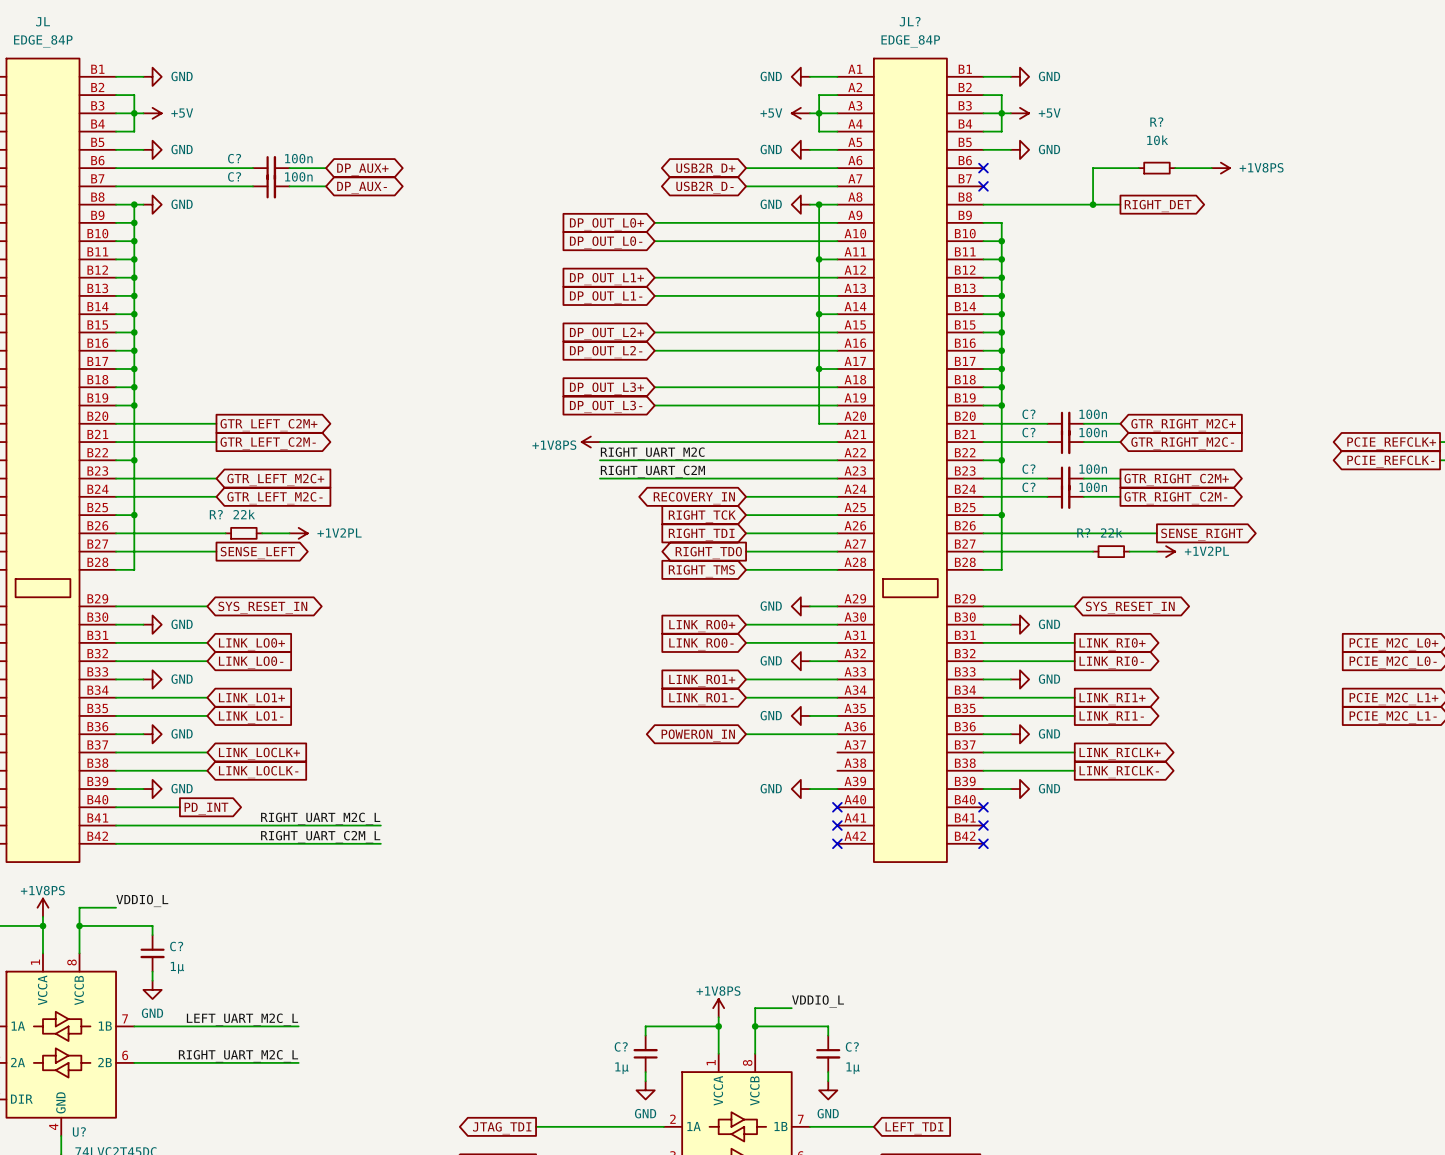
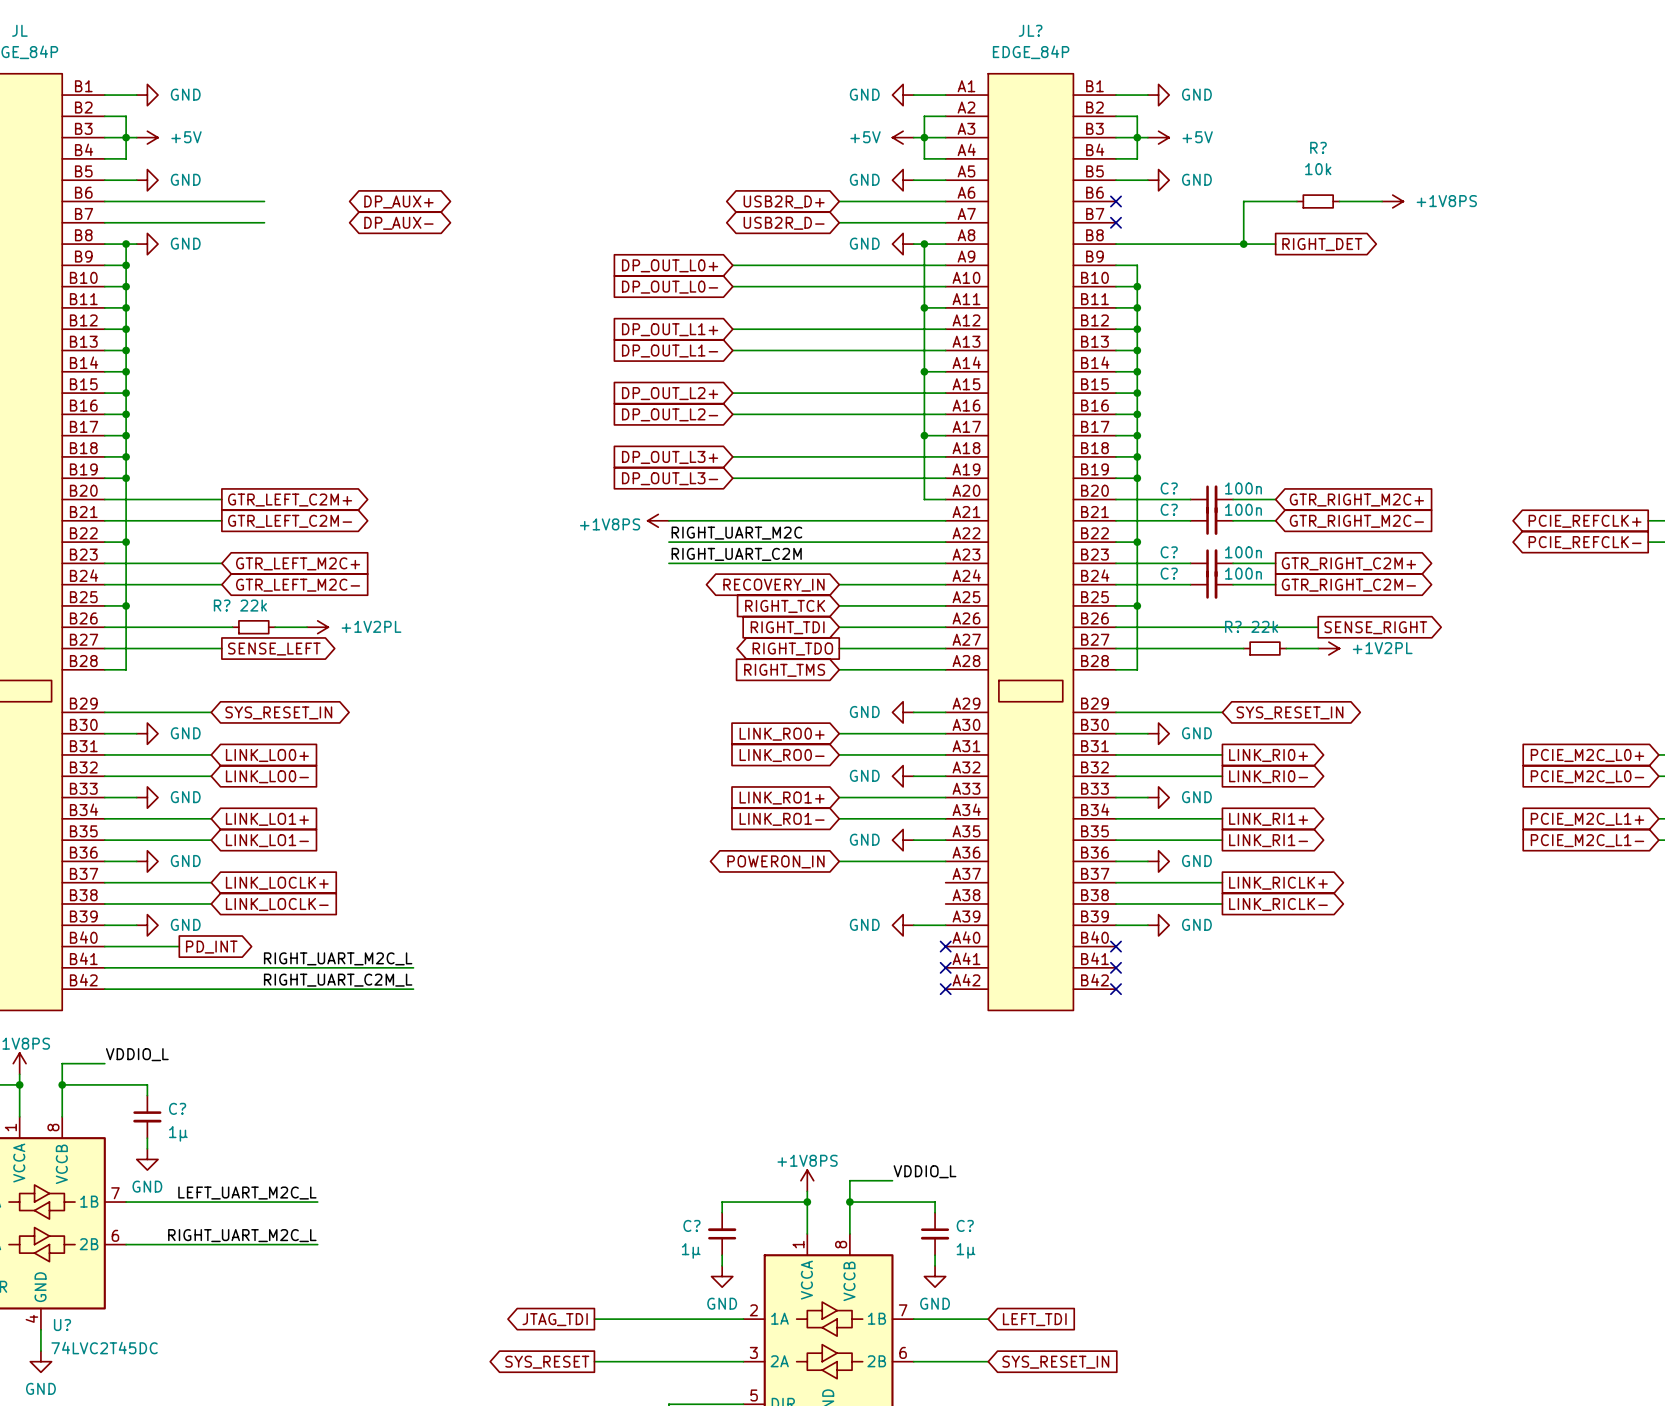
C?: 100n (271, 168) -> none
wire: (289, 168) (326, 168) -> none
C?: 100n (271, 186) -> none
wire: (289, 186) (326, 186) -> none

